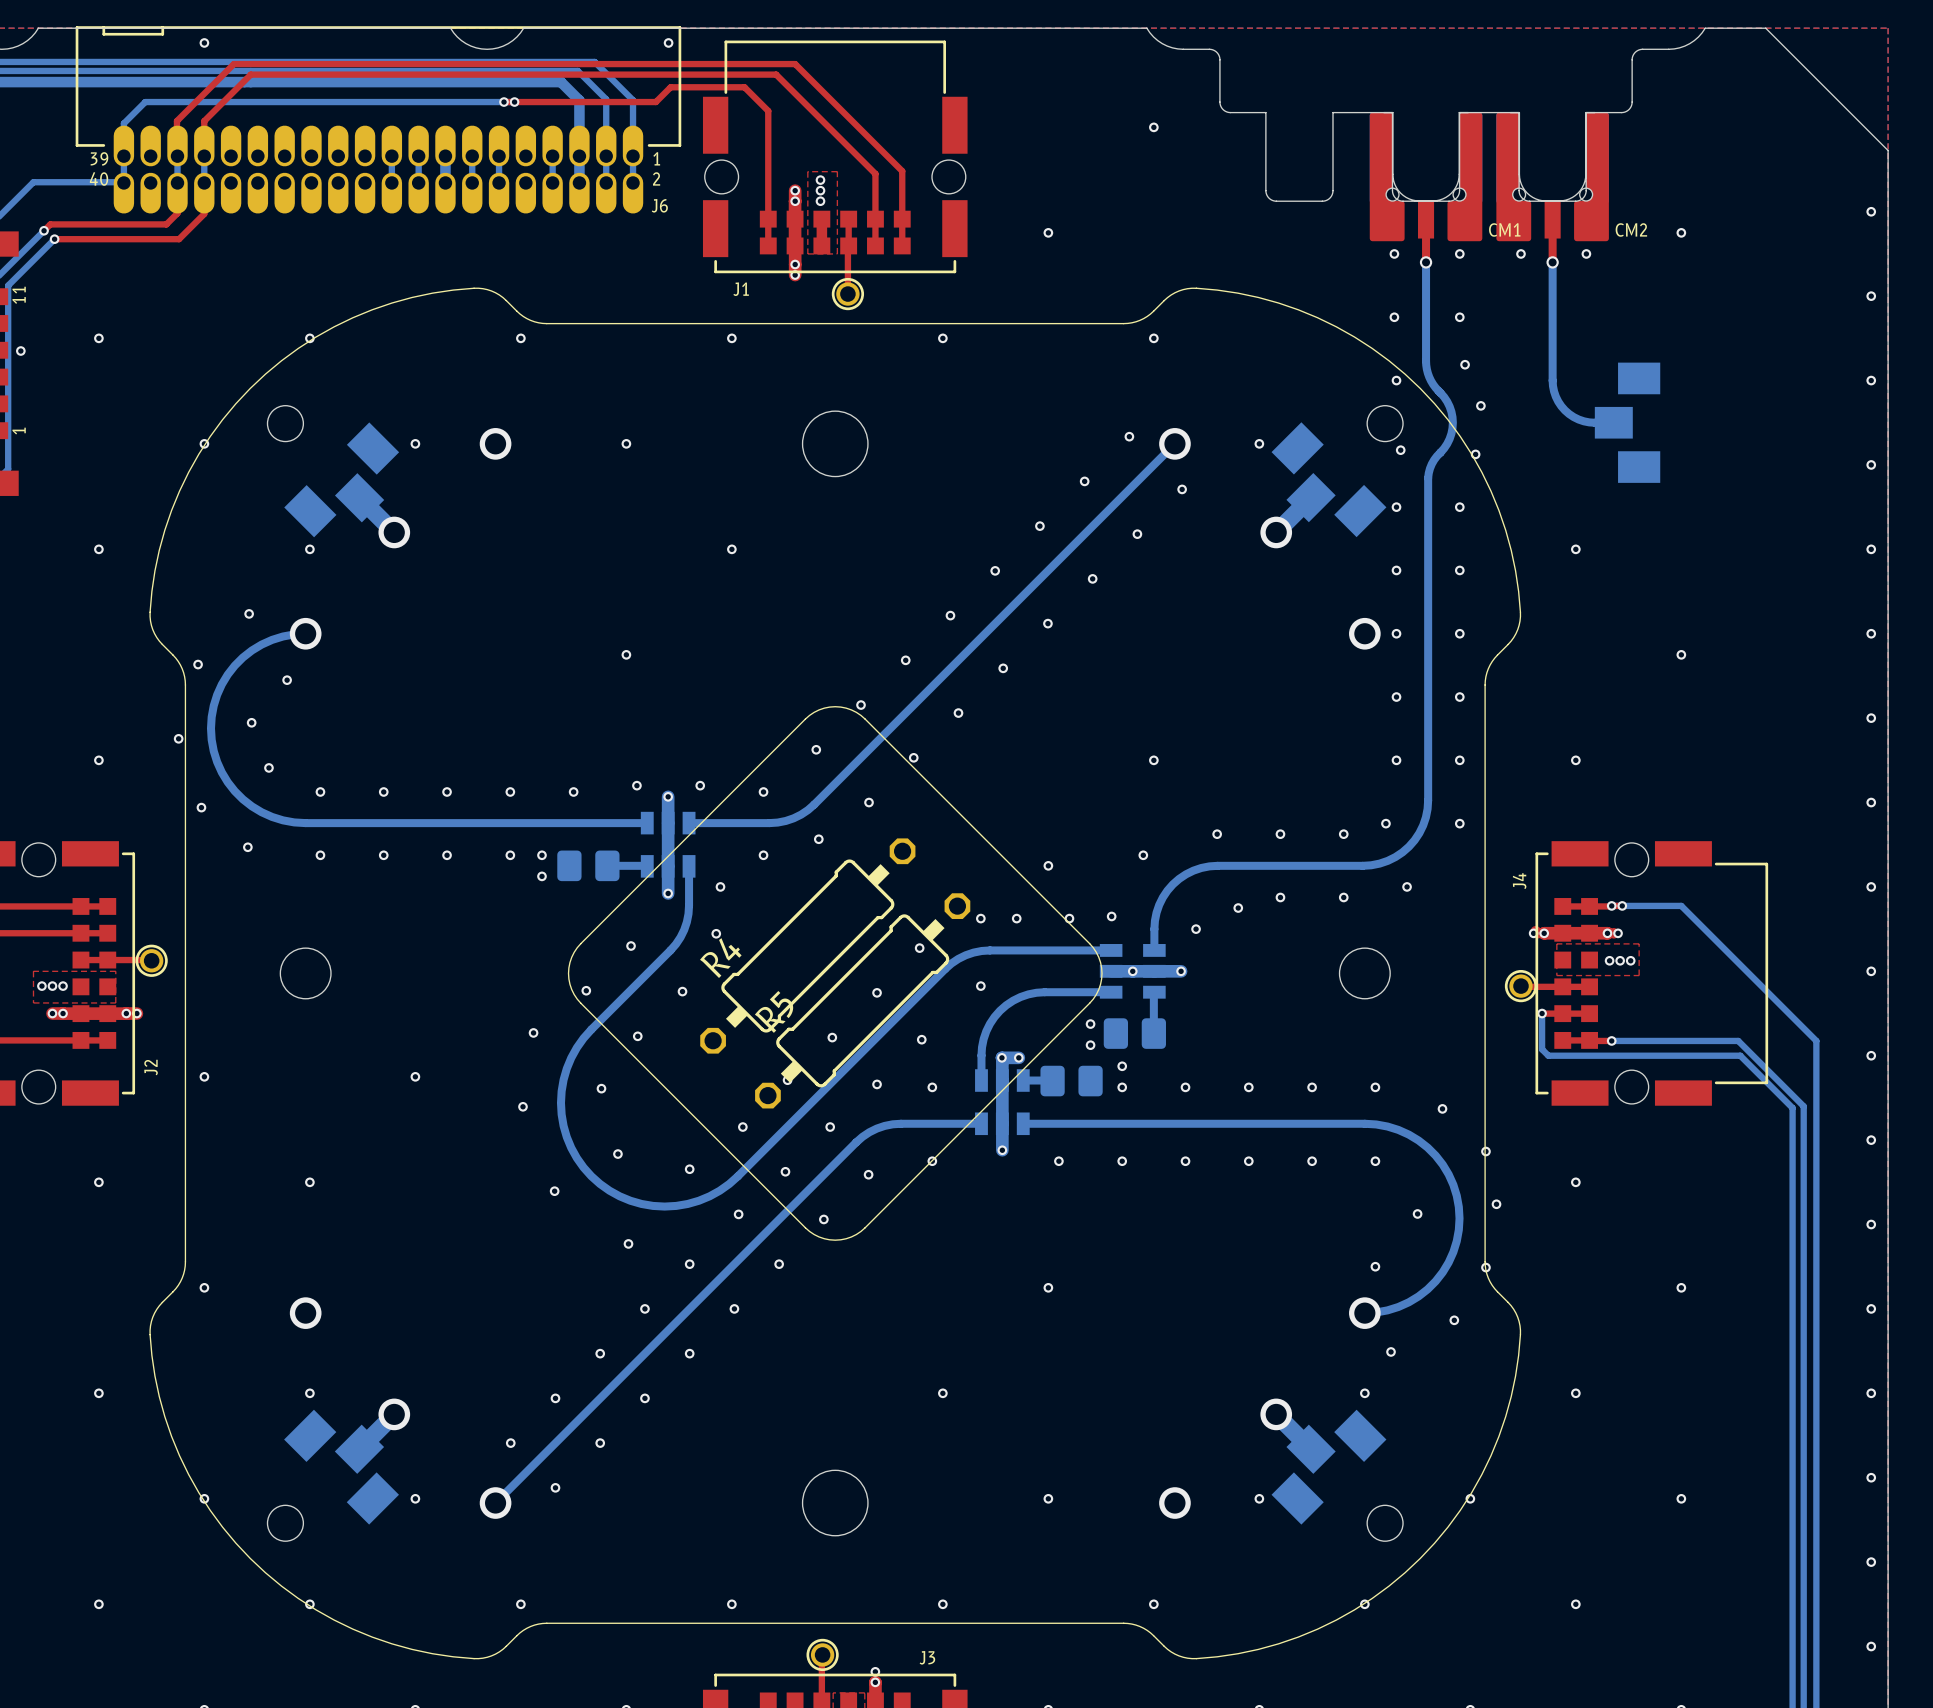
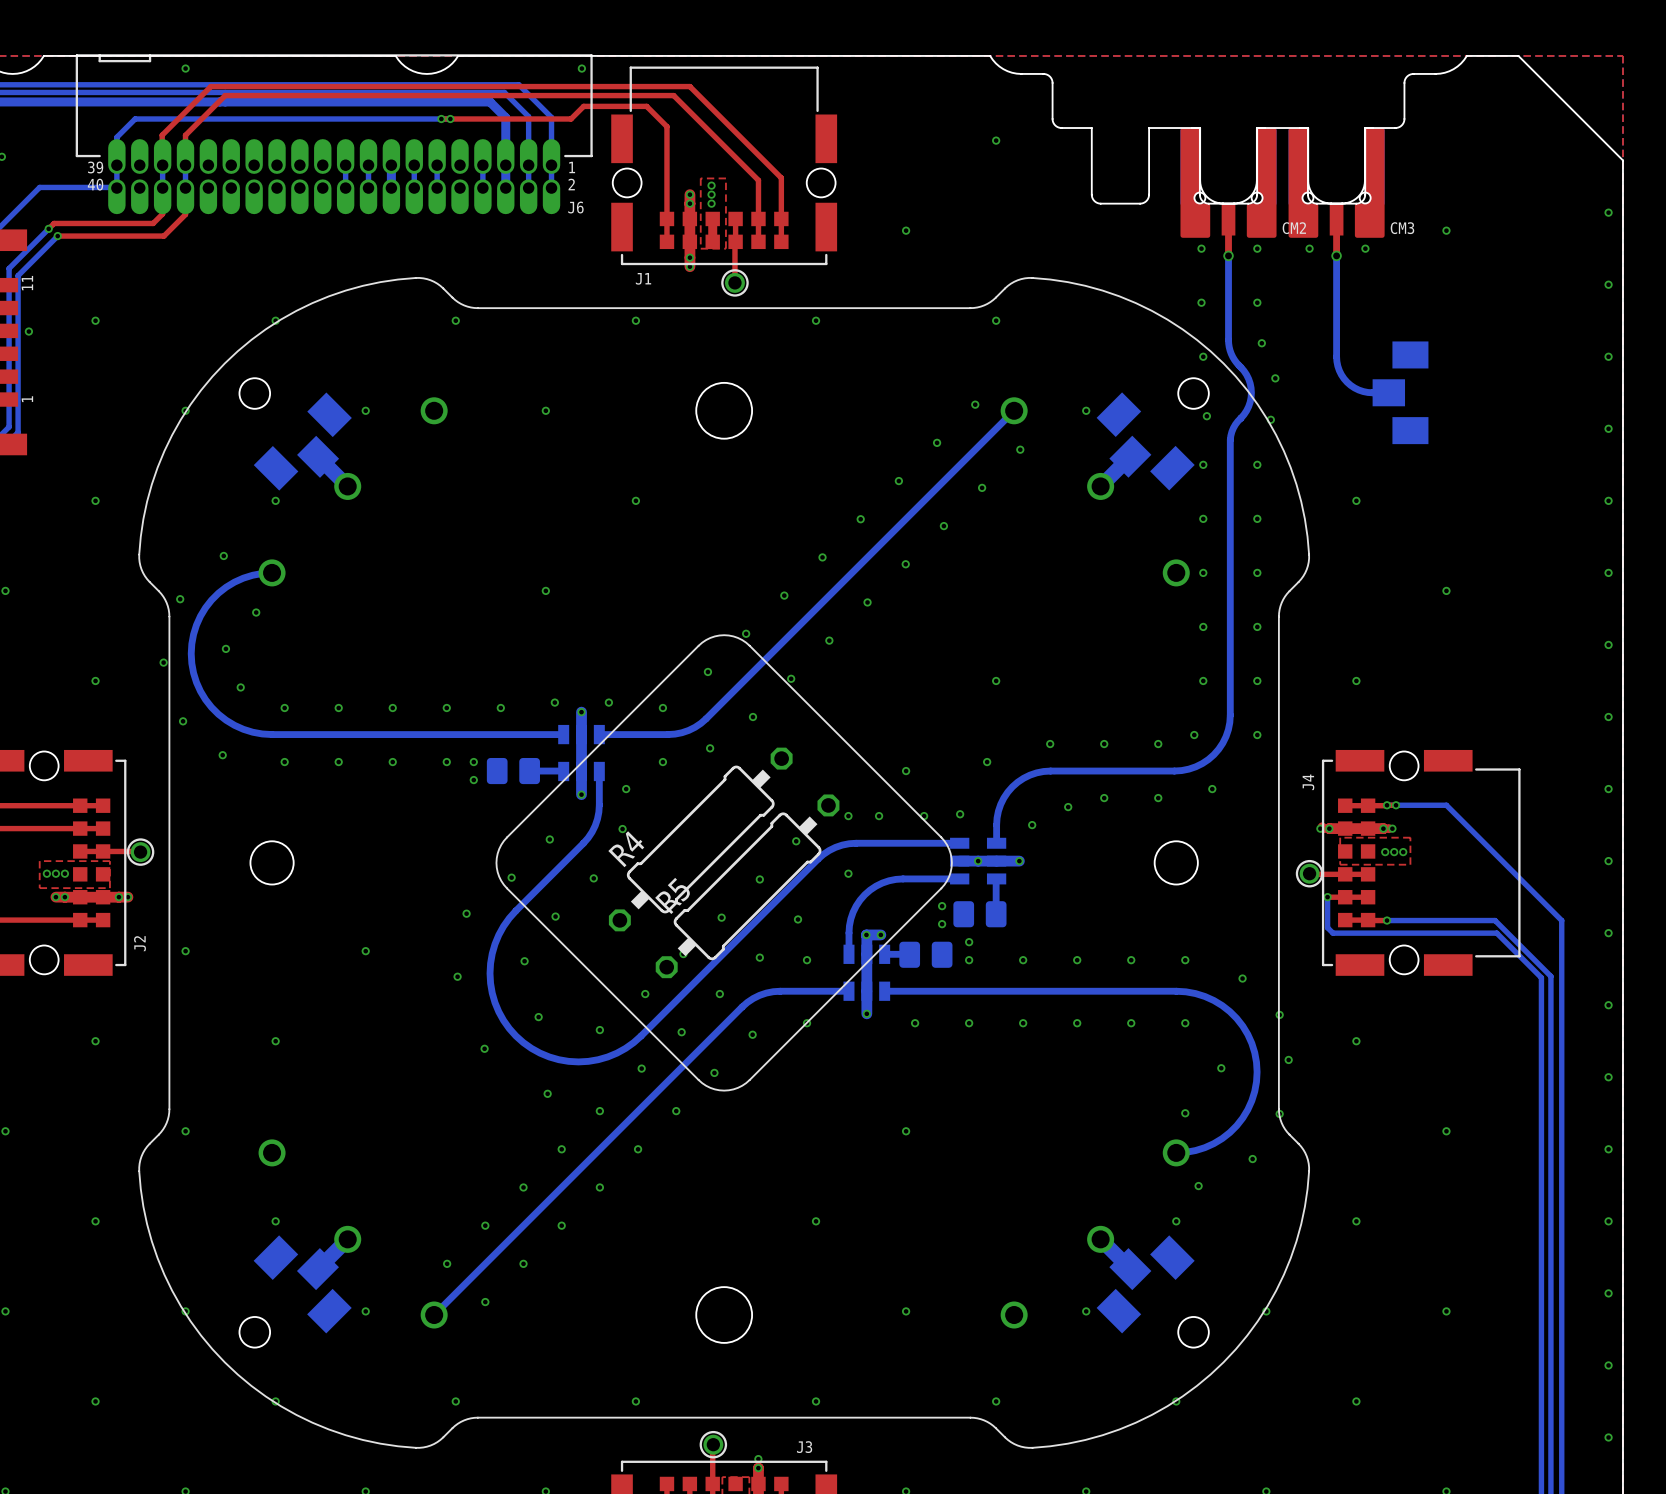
CM1 name: CM1 (1504, 229) -> CM2 (1294, 228)
CM2 name: CM2 (1631, 229) -> CM3 (1402, 228)

